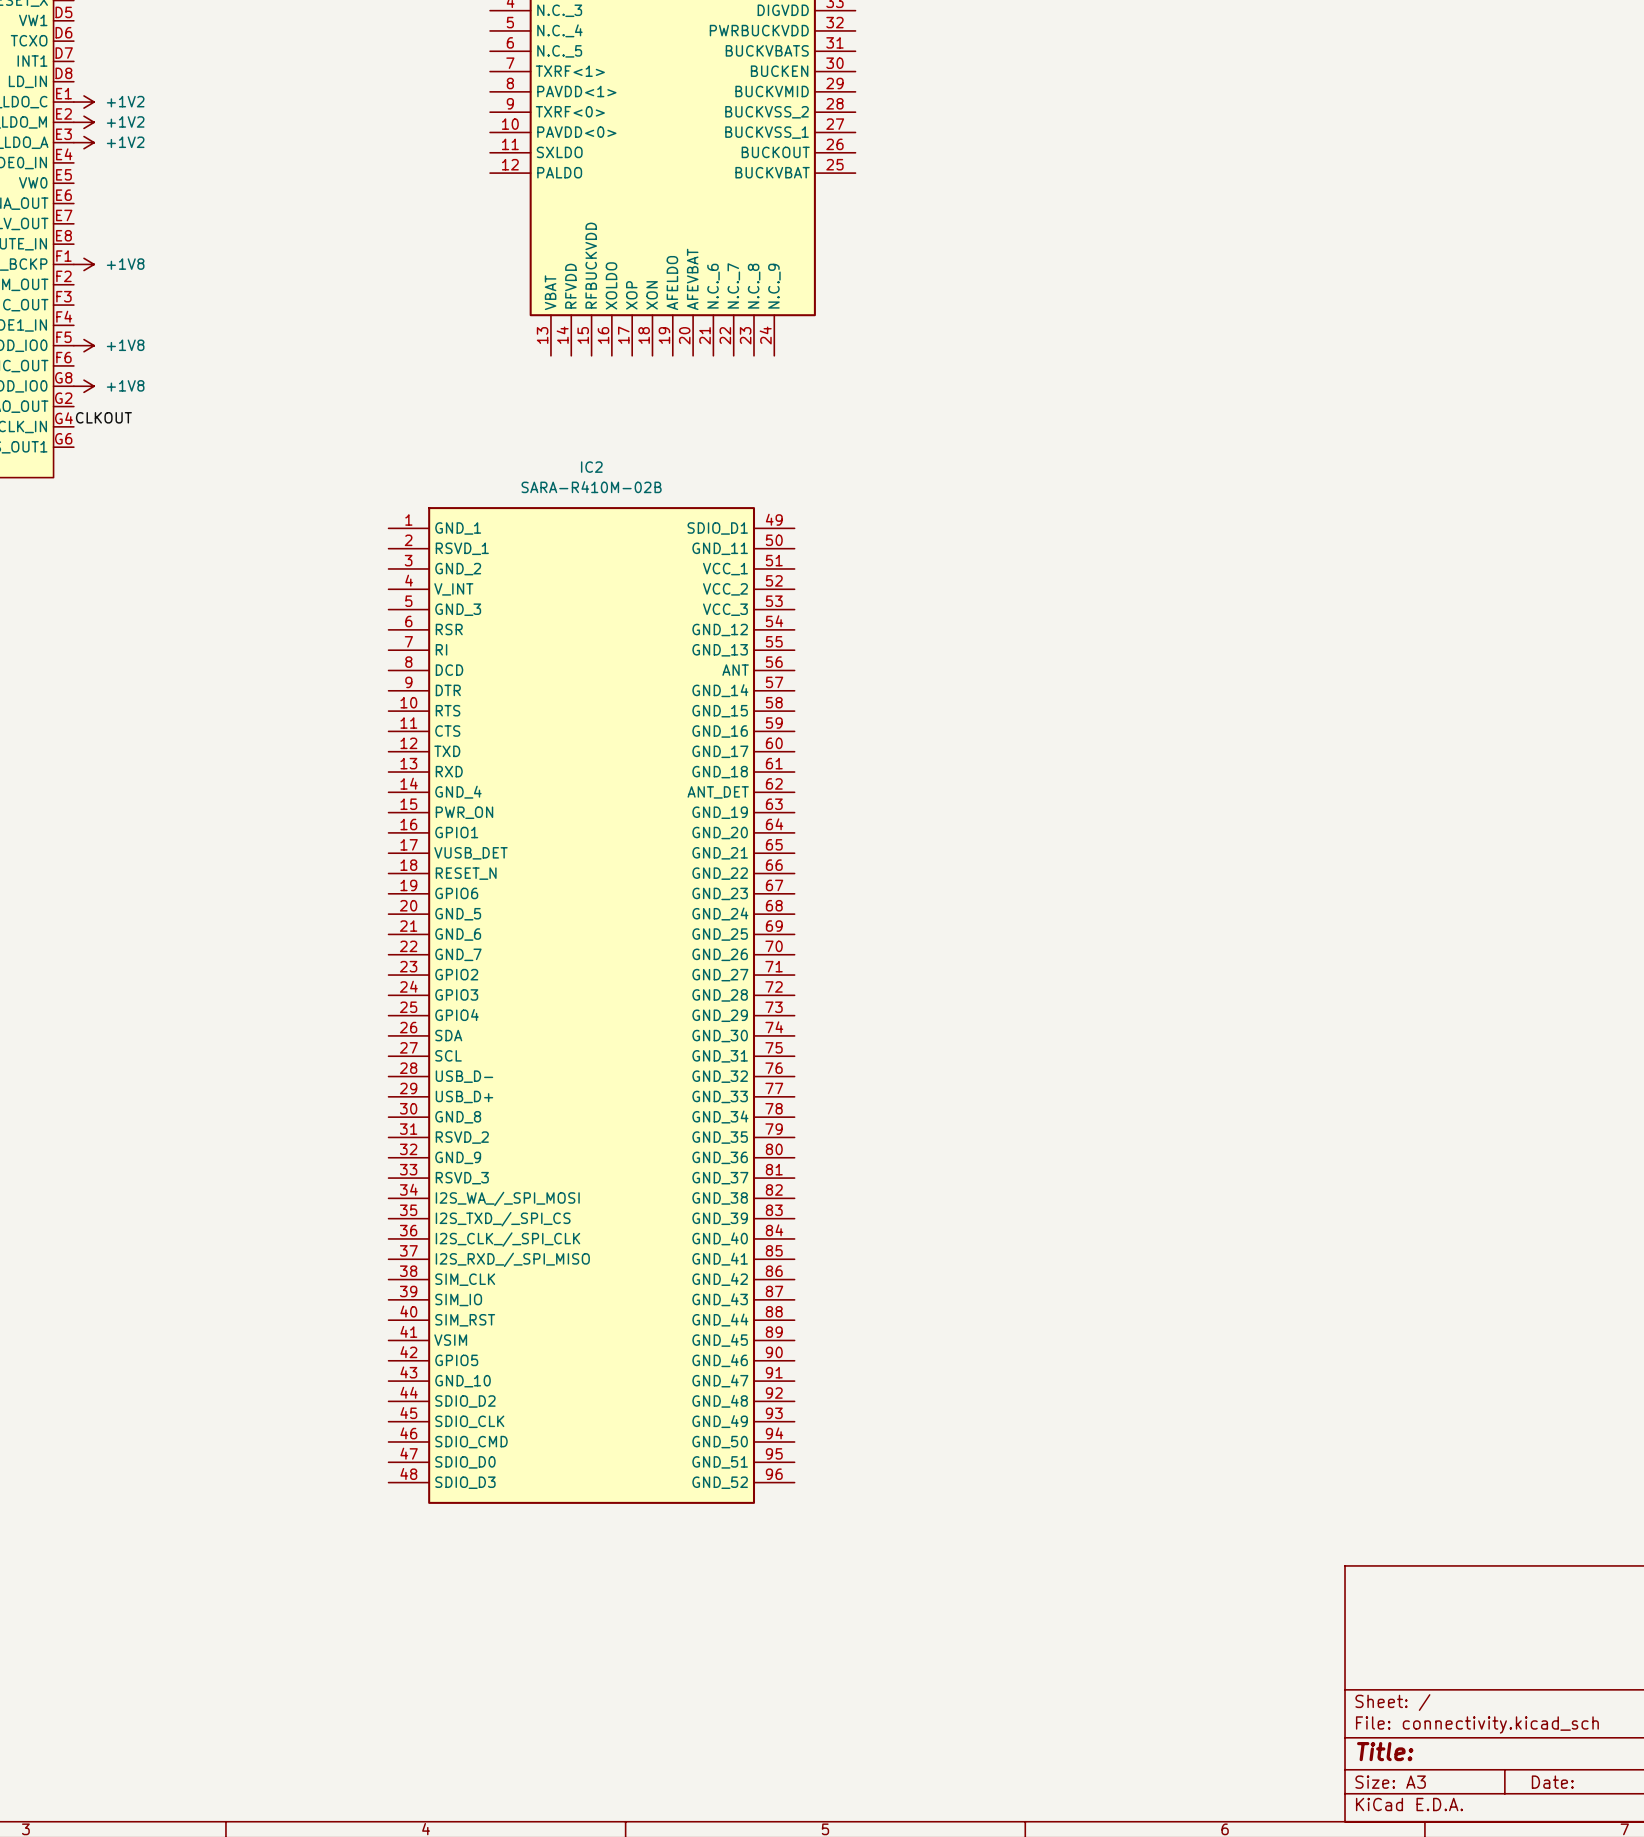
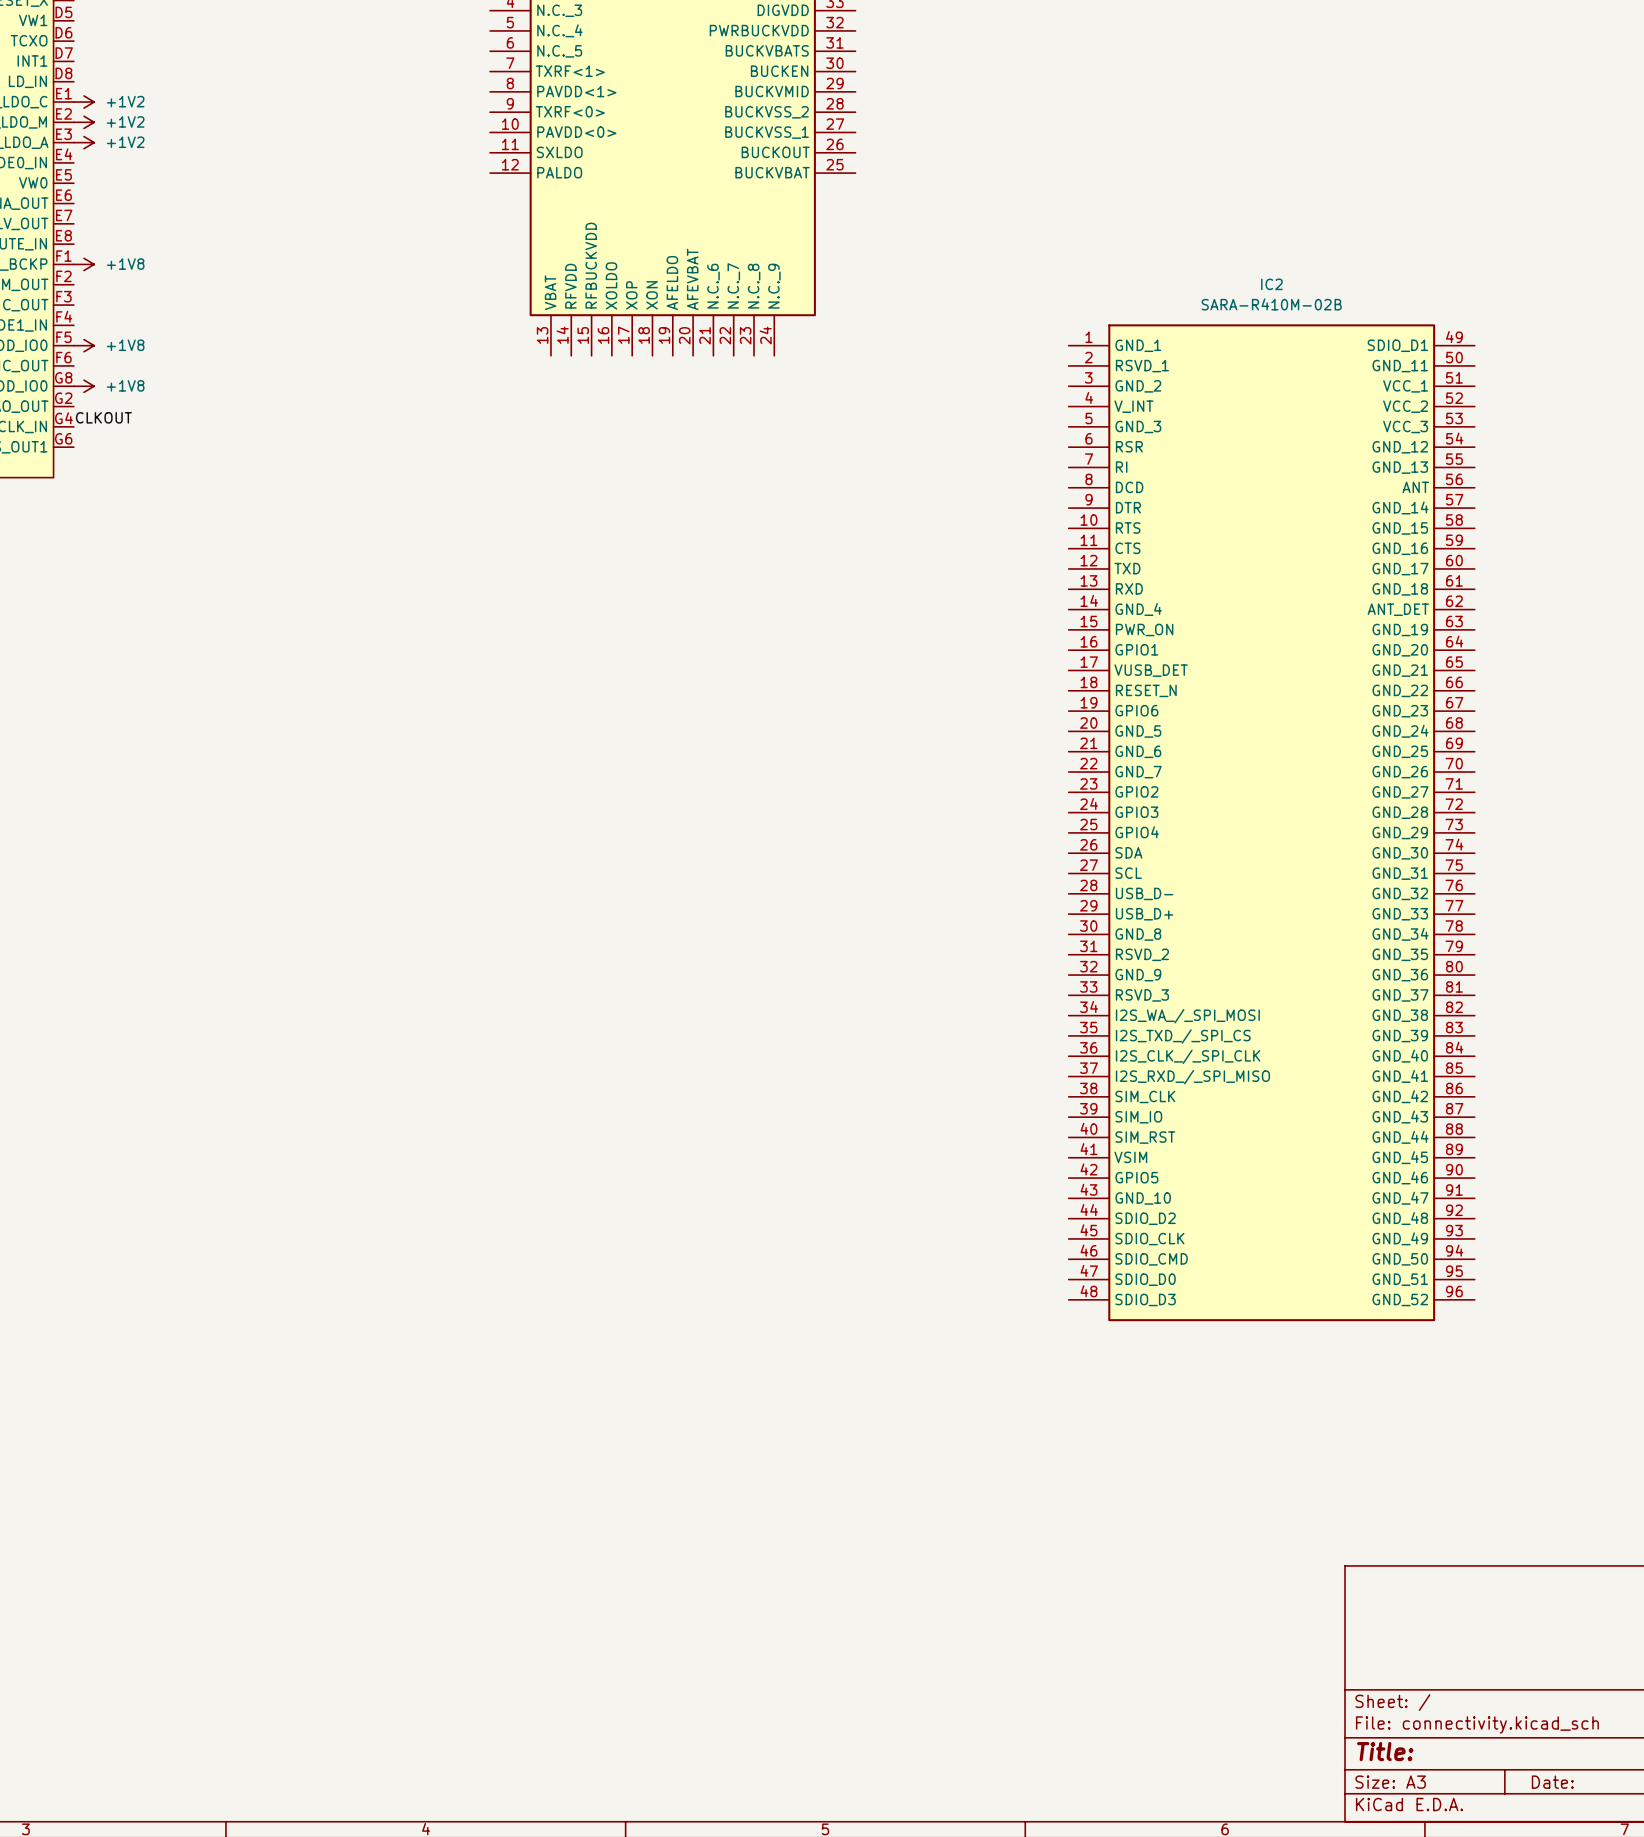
IC2 position: (591, 1005) -> (1271, 822)

